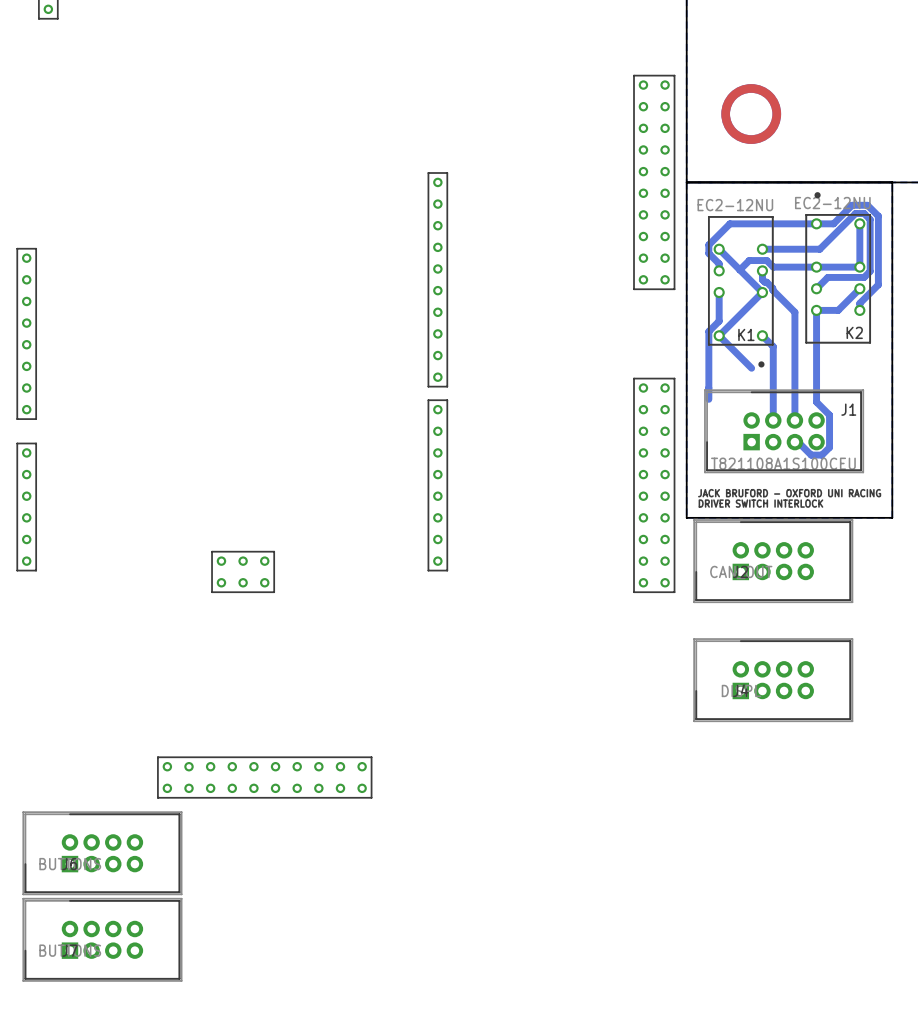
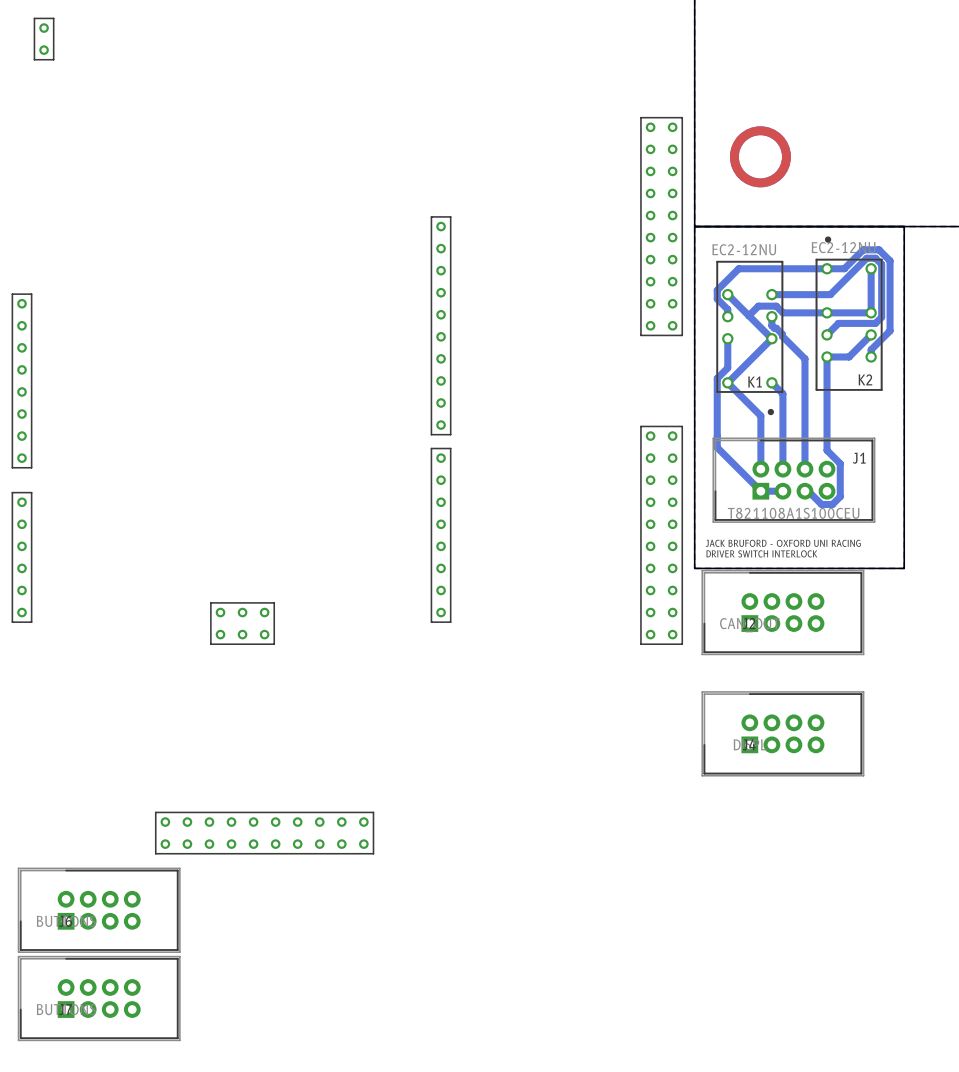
bottom track: none -> (760, 415) (760, 469)
bottom track: none -> (717, 447) (760, 491) (782, 491)

